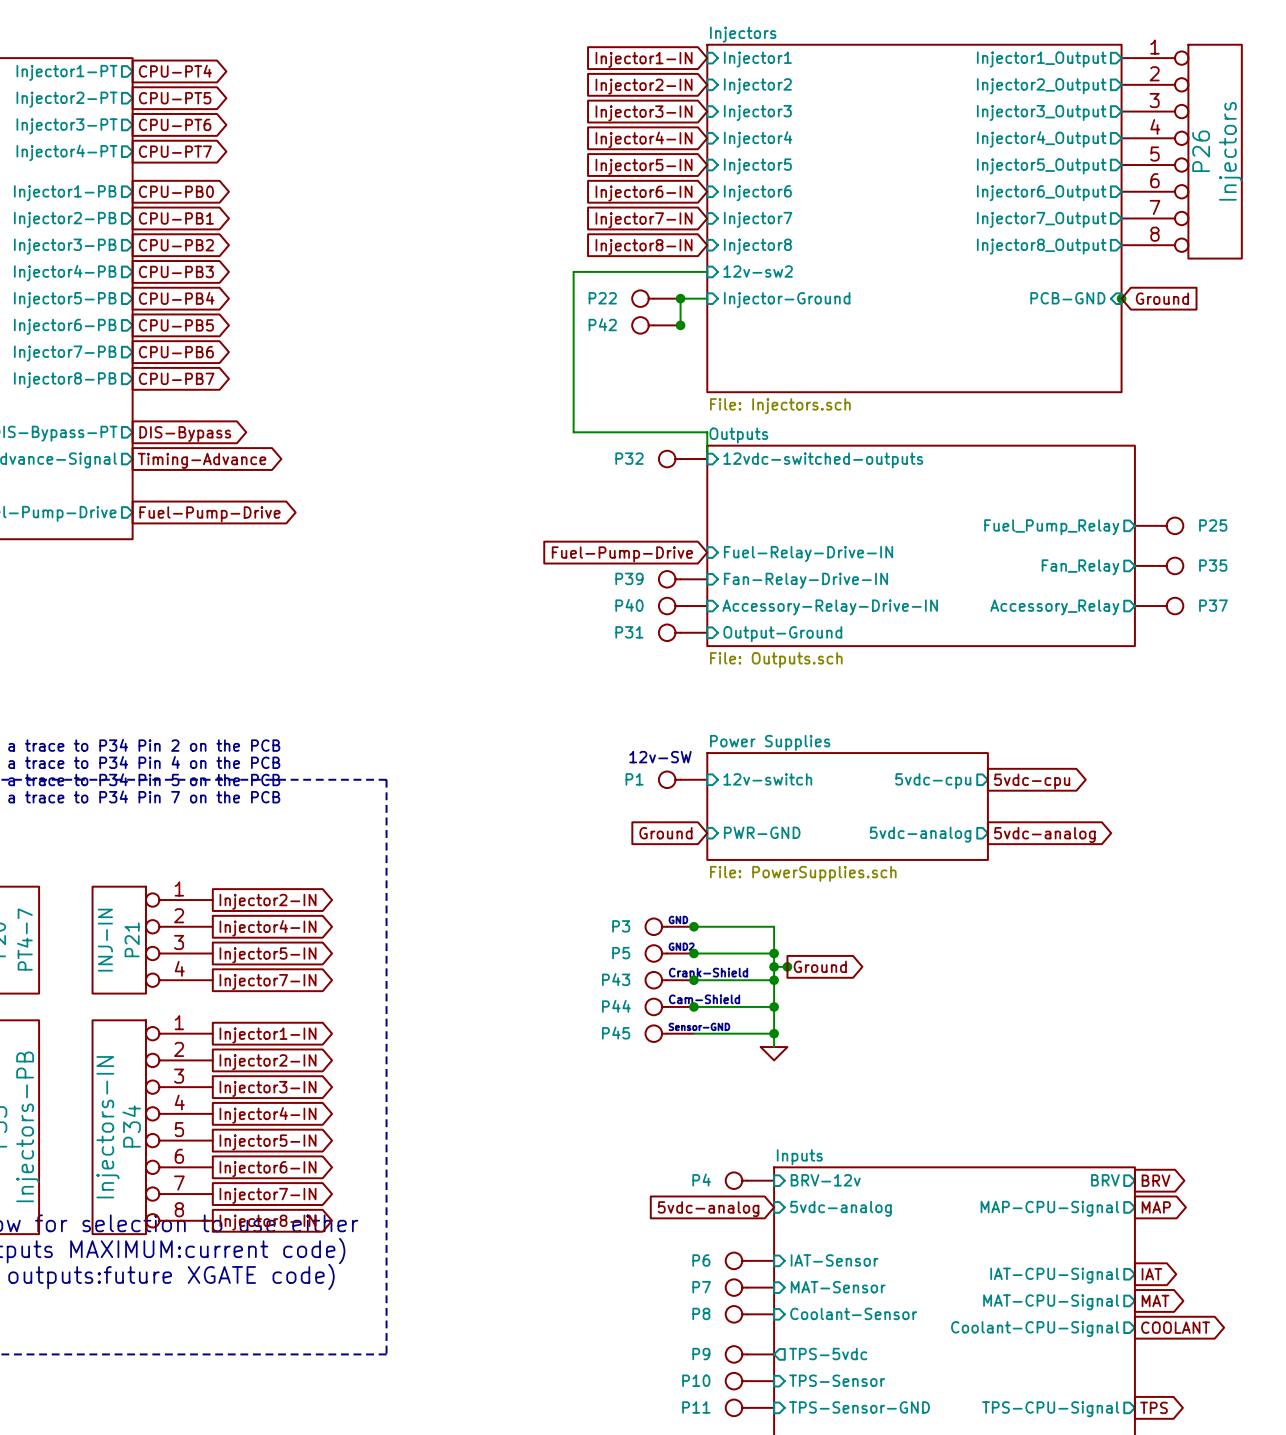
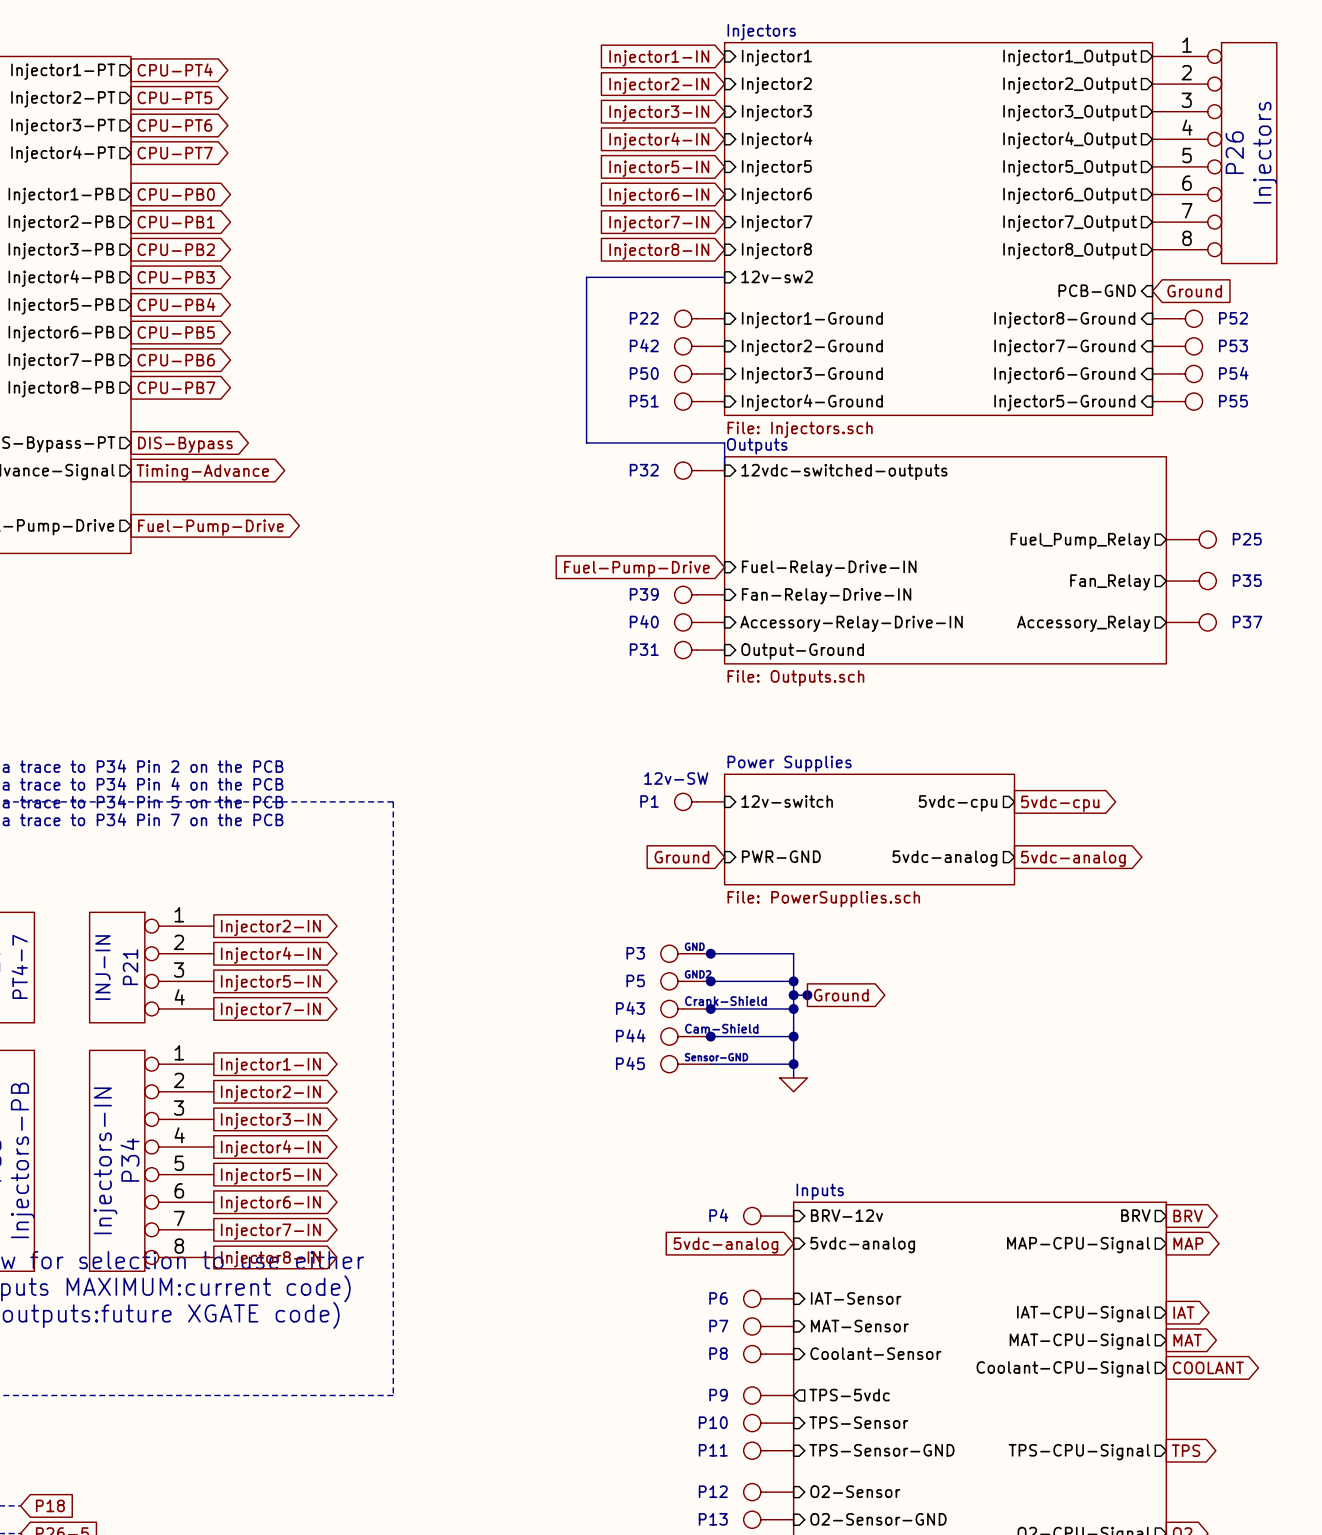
sheet Injectors shape: [707, 44, 1122, 393] -> [724, 42, 1153, 416]
P22 position: (656, 298) -> (699, 318)
junction: (680, 298) -> none
wire: (707, 298) (680, 298) (680, 325) -> none
sheet pin position: PCB-GND (1067, 298) -> PCB-GND (1097, 290)
junction: (1121, 298) -> none
global label position: Ground (1162, 298) -> Ground (1194, 291)
sheet pin: Injector-Ground (787, 300) -> Injector1-Ground (812, 320)
P52: none -> (1177, 318)
sheet pin: none -> Injector8-Ground (1064, 320)
P42 position: (656, 325) -> (699, 346)
junction: (680, 325) -> none
P53: none -> (1177, 346)
sheet pin: none -> Injector2-Ground (812, 347)
sheet pin: none -> Injector7-Ground (1064, 347)
P50: none -> (699, 373)
P54: none -> (1177, 373)
sheet pin: none -> Injector3-Ground (812, 375)
sheet pin: none -> Injector6-Ground (1064, 375)
P51: none -> (699, 401)
P55: none -> (1177, 401)
sheet pin: none -> Injector4-Ground (812, 402)
sheet pin: none -> Injector5-Ground (1064, 403)

